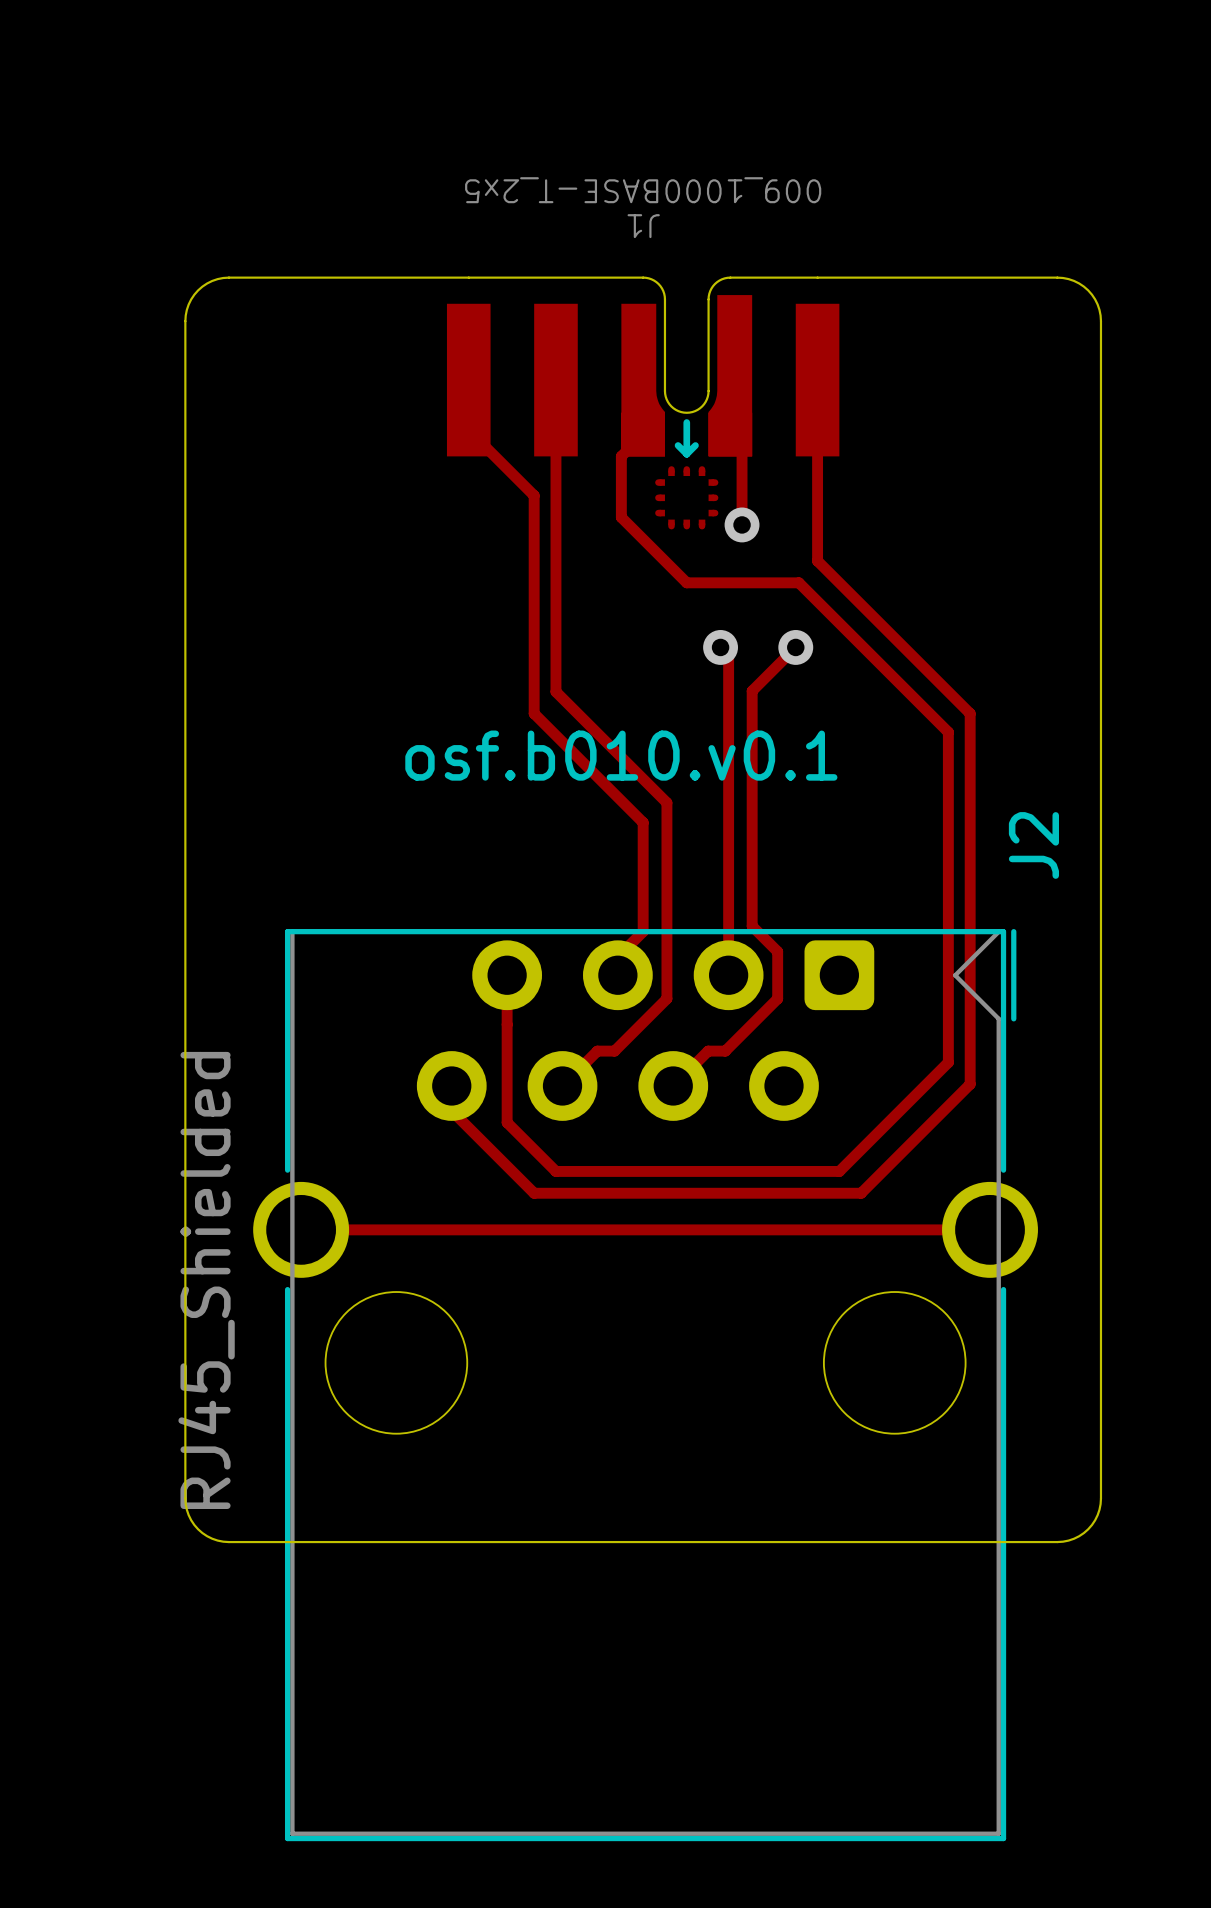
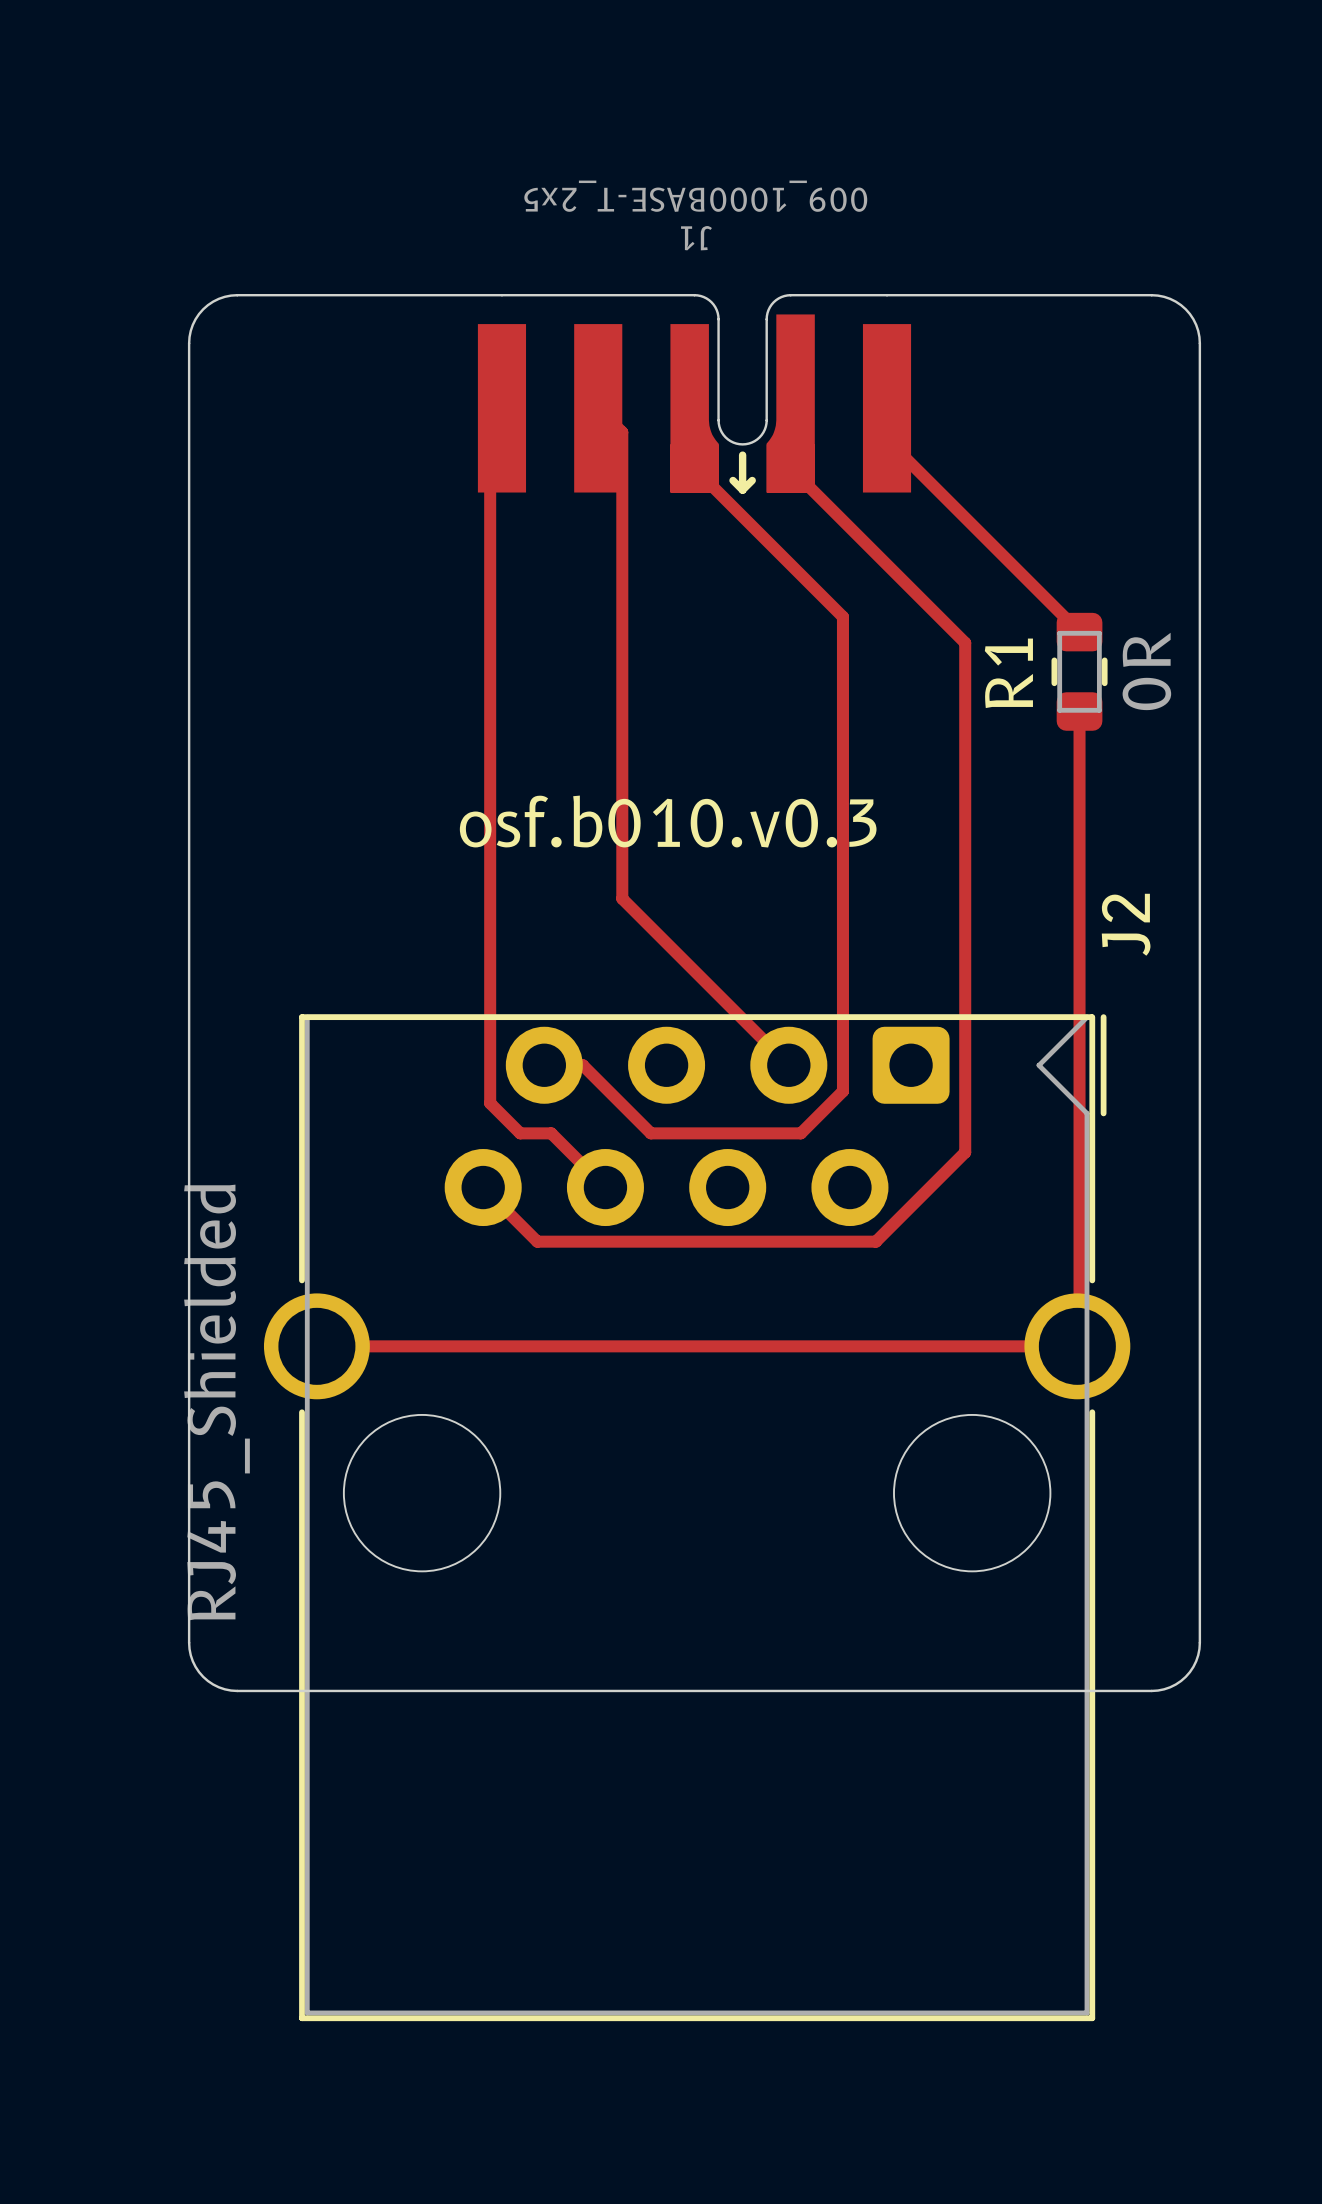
J1 footprint: [446, 276, 840, 530] -> [477, 293, 912, 494]
track: (468, 380) (468, 430) (534, 495) (534, 713) (643, 822) (643, 931) (617, 956) (617, 975) -> none
track: (555, 380) (555, 691) (666, 802) (666, 998) (614, 1051) (597, 1051) (562, 1085) -> (501, 408) (490, 420) (490, 1103) (520, 1133) (551, 1133) (605, 1187)
track: (817, 408) (817, 561) (970, 713) (970, 1084) (861, 1193) (534, 1193) (451, 1110) (451, 1085) -> (803, 481) (965, 642) (965, 1152) (875, 1241) (537, 1241) (483, 1187)
track: none -> (887, 439) (1079, 632)
track: (643, 434) (621, 456) (621, 517) (686, 582) (798, 582) (948, 732) (948, 1062) (839, 1171) (555, 1171) (507, 1122) (507, 975) -> none
track: (742, 446) (742, 524) -> none
via: (742, 524) -> none
R1: none -> 0R (1079, 671)
track: (720, 647) (728, 655) (728, 975) -> (598, 408) (622, 432) (622, 898) (788, 1065)
via: (720, 647) -> none
track: (795, 647) (752, 691) (752, 926) (777, 951) -> (694, 468) (842, 616) (842, 1039)
via: (795, 647) -> none
track: none -> (1079, 711) (1079, 1344) (1077, 1346)
text: osf.b010.v0.1 (621, 755) -> osf.b010.v0.3 (668, 821)
track: (739, 1036) (725, 1051) (708, 1051) (673, 1085) -> (800, 1133) (650, 1133) (582, 1065) (544, 1065)

